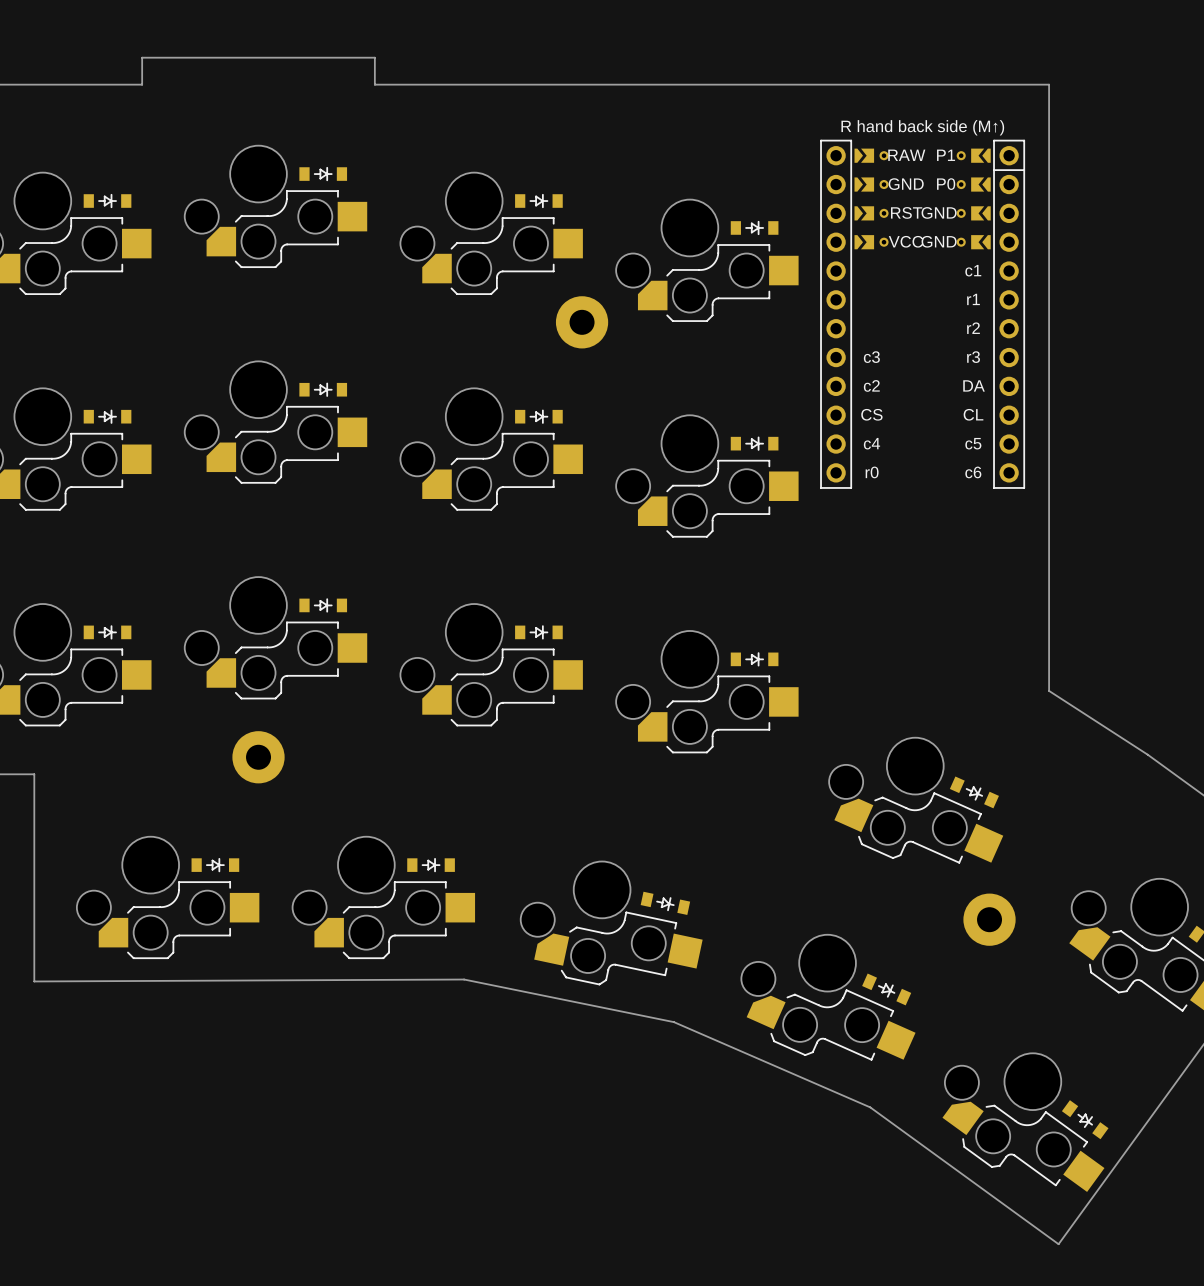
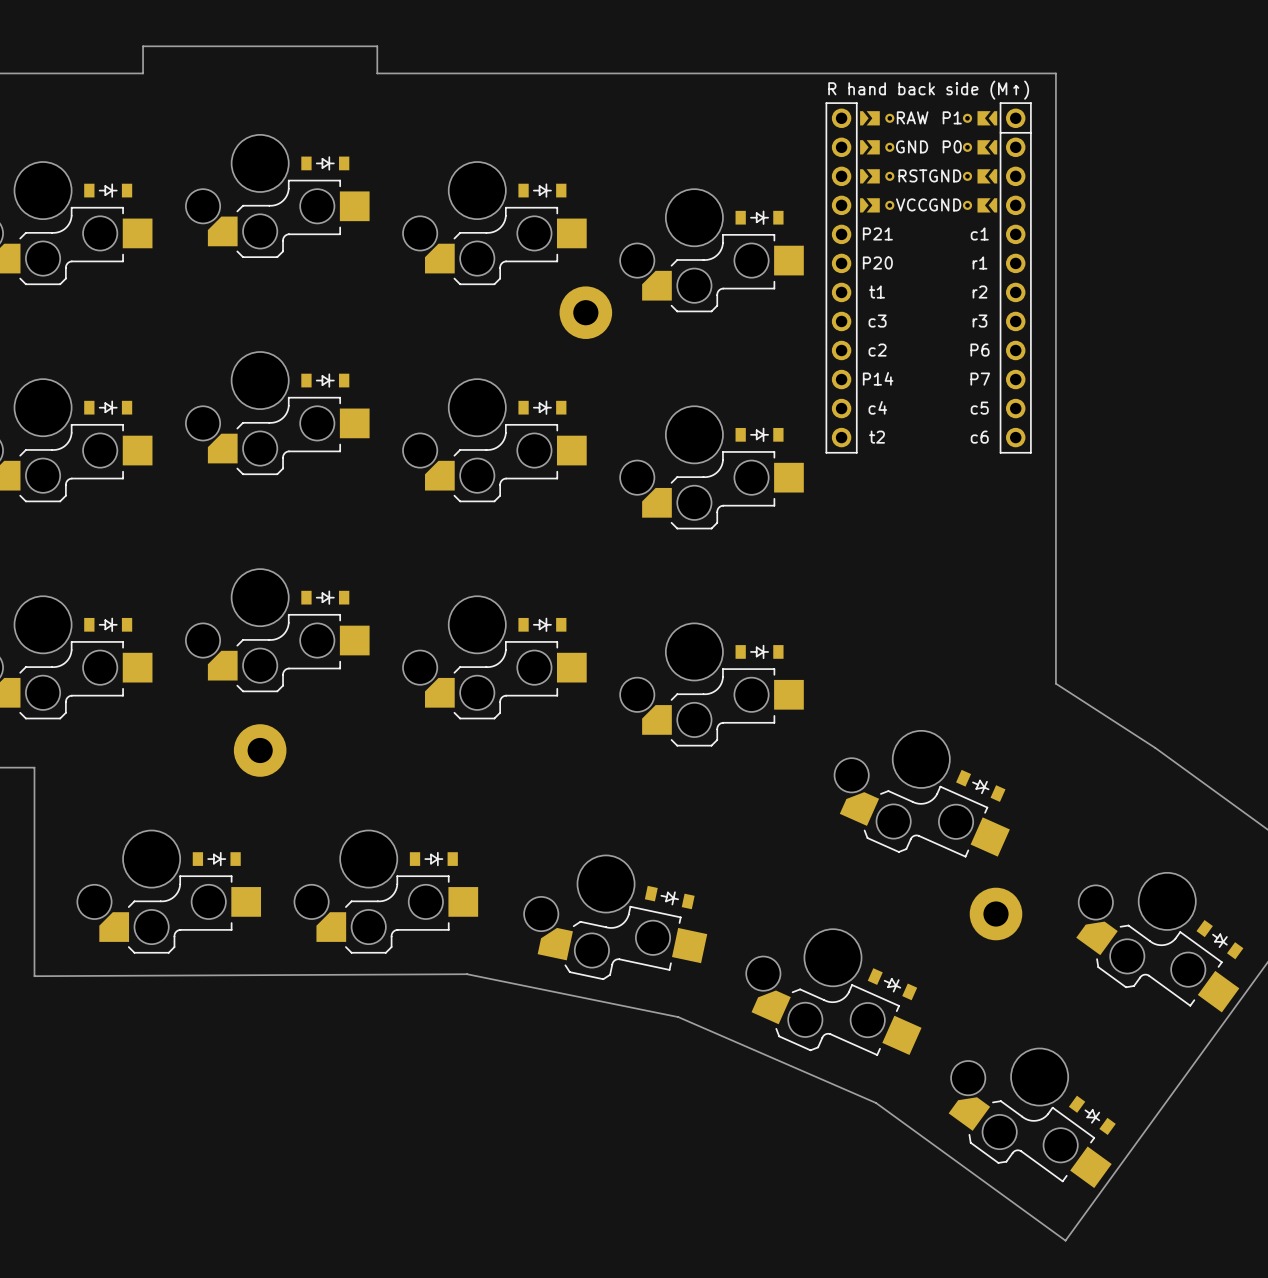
part: none -> (928, 277)
part: (922, 314) -> none

